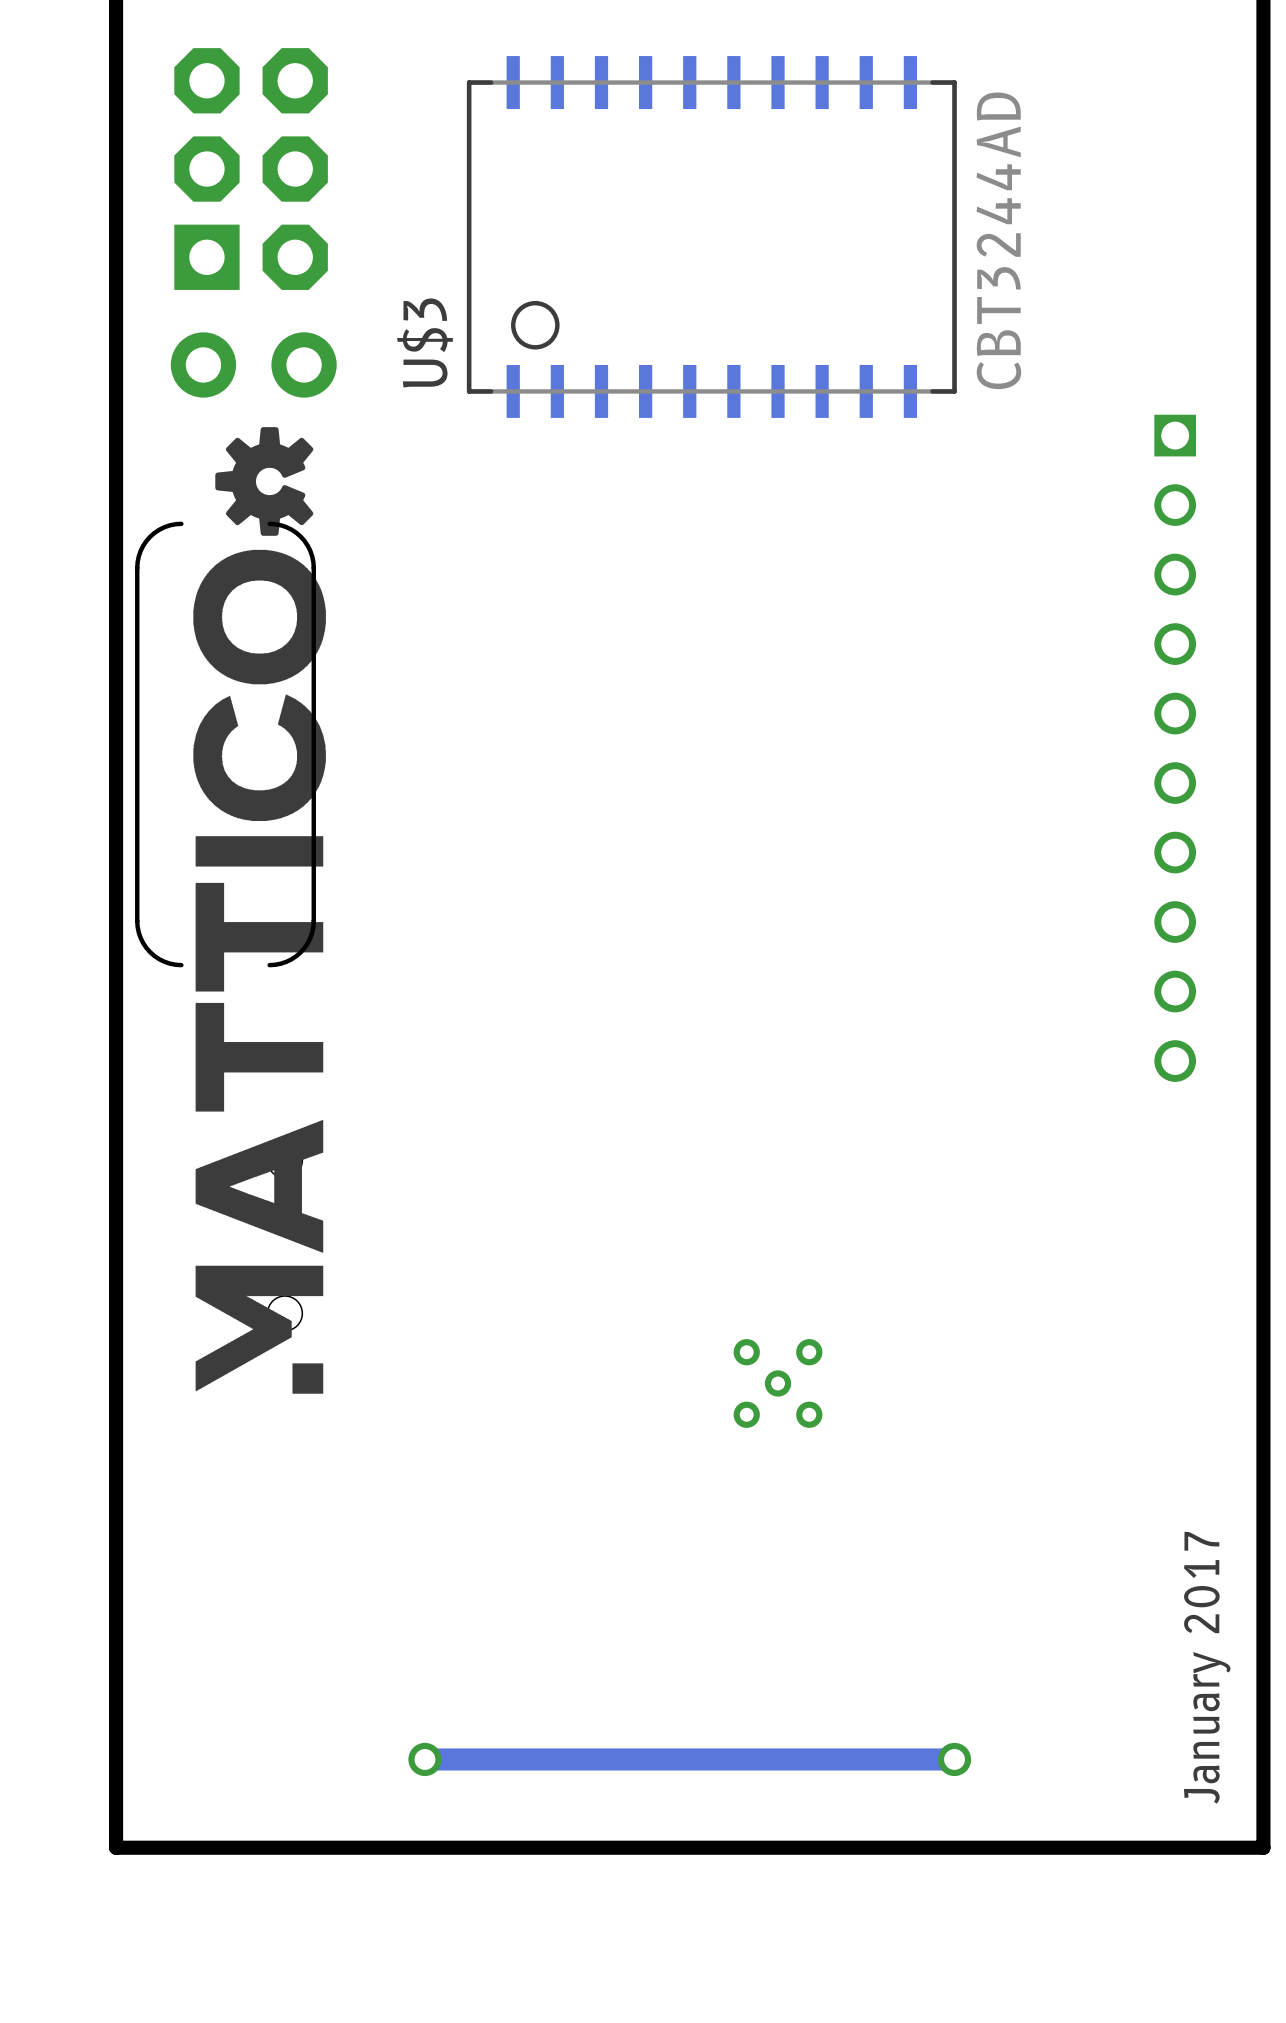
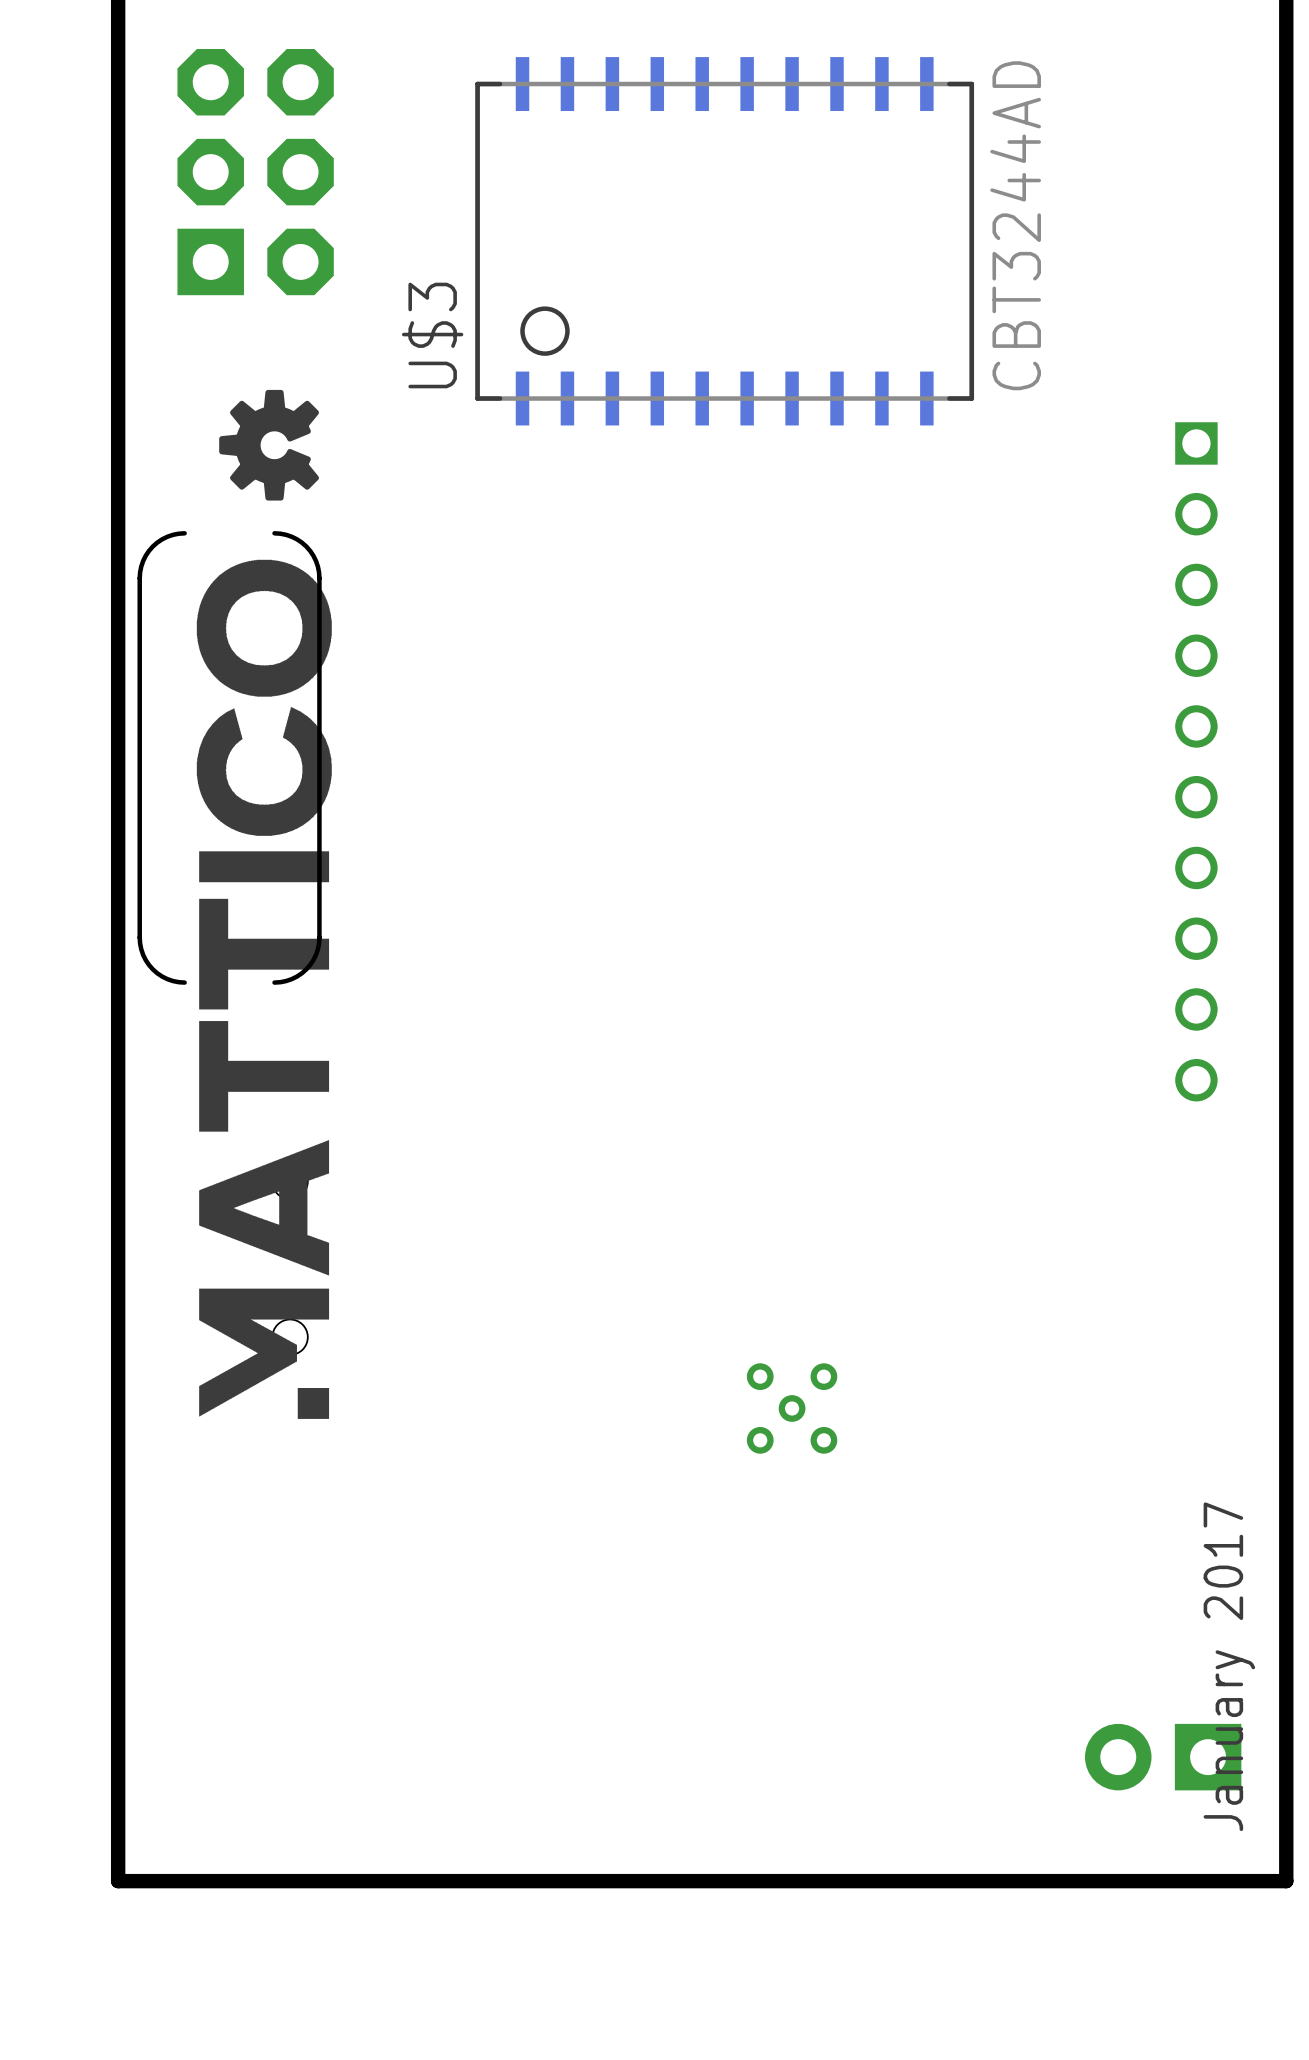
part: (253, 364) -> none
drawing position: (264, 481) -> (269, 445)
part: none -> (1163, 1757)
via: (424, 1759) -> none
track: (954, 1759) (424, 1759) -> none
via: (954, 1759) -> none

